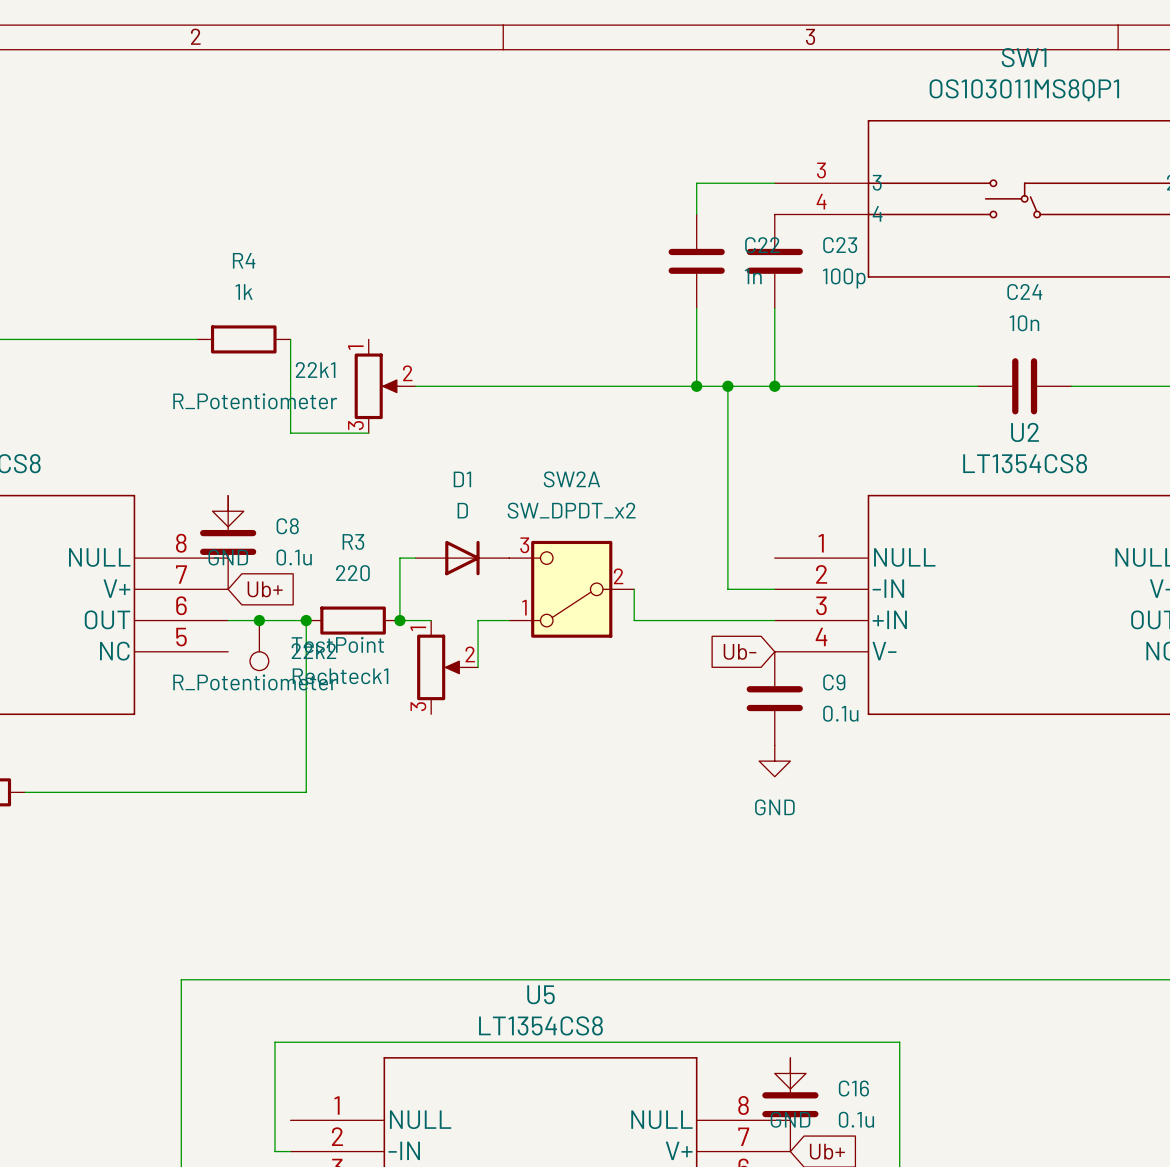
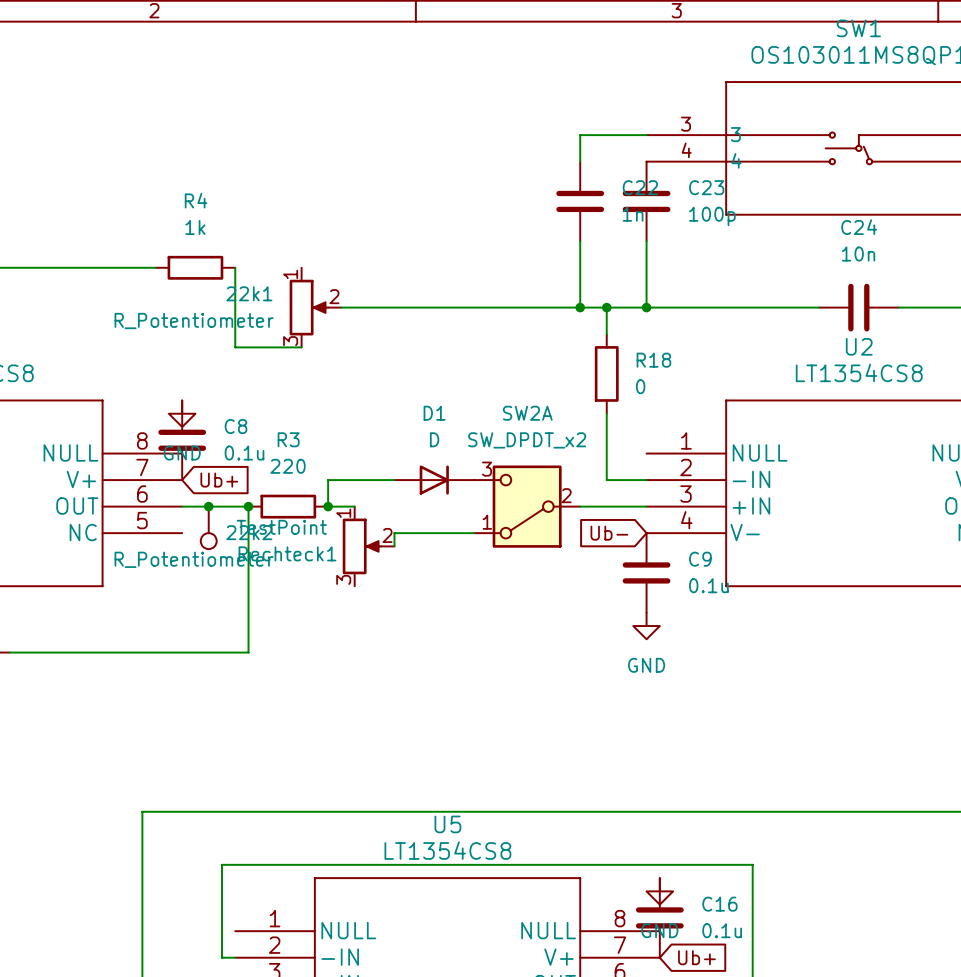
wire: (727, 417) (727, 511) -> none
R18: none -> 0 (606, 373)
wire: (415, 558) (399, 558) (399, 589) -> (394, 480) (328, 480)
D1 position: (462, 558) -> (434, 480)
SW2A position: (571, 589) -> (527, 506)
wire: (509, 620) (478, 620) (478, 651) -> (474, 533) (394, 533)

